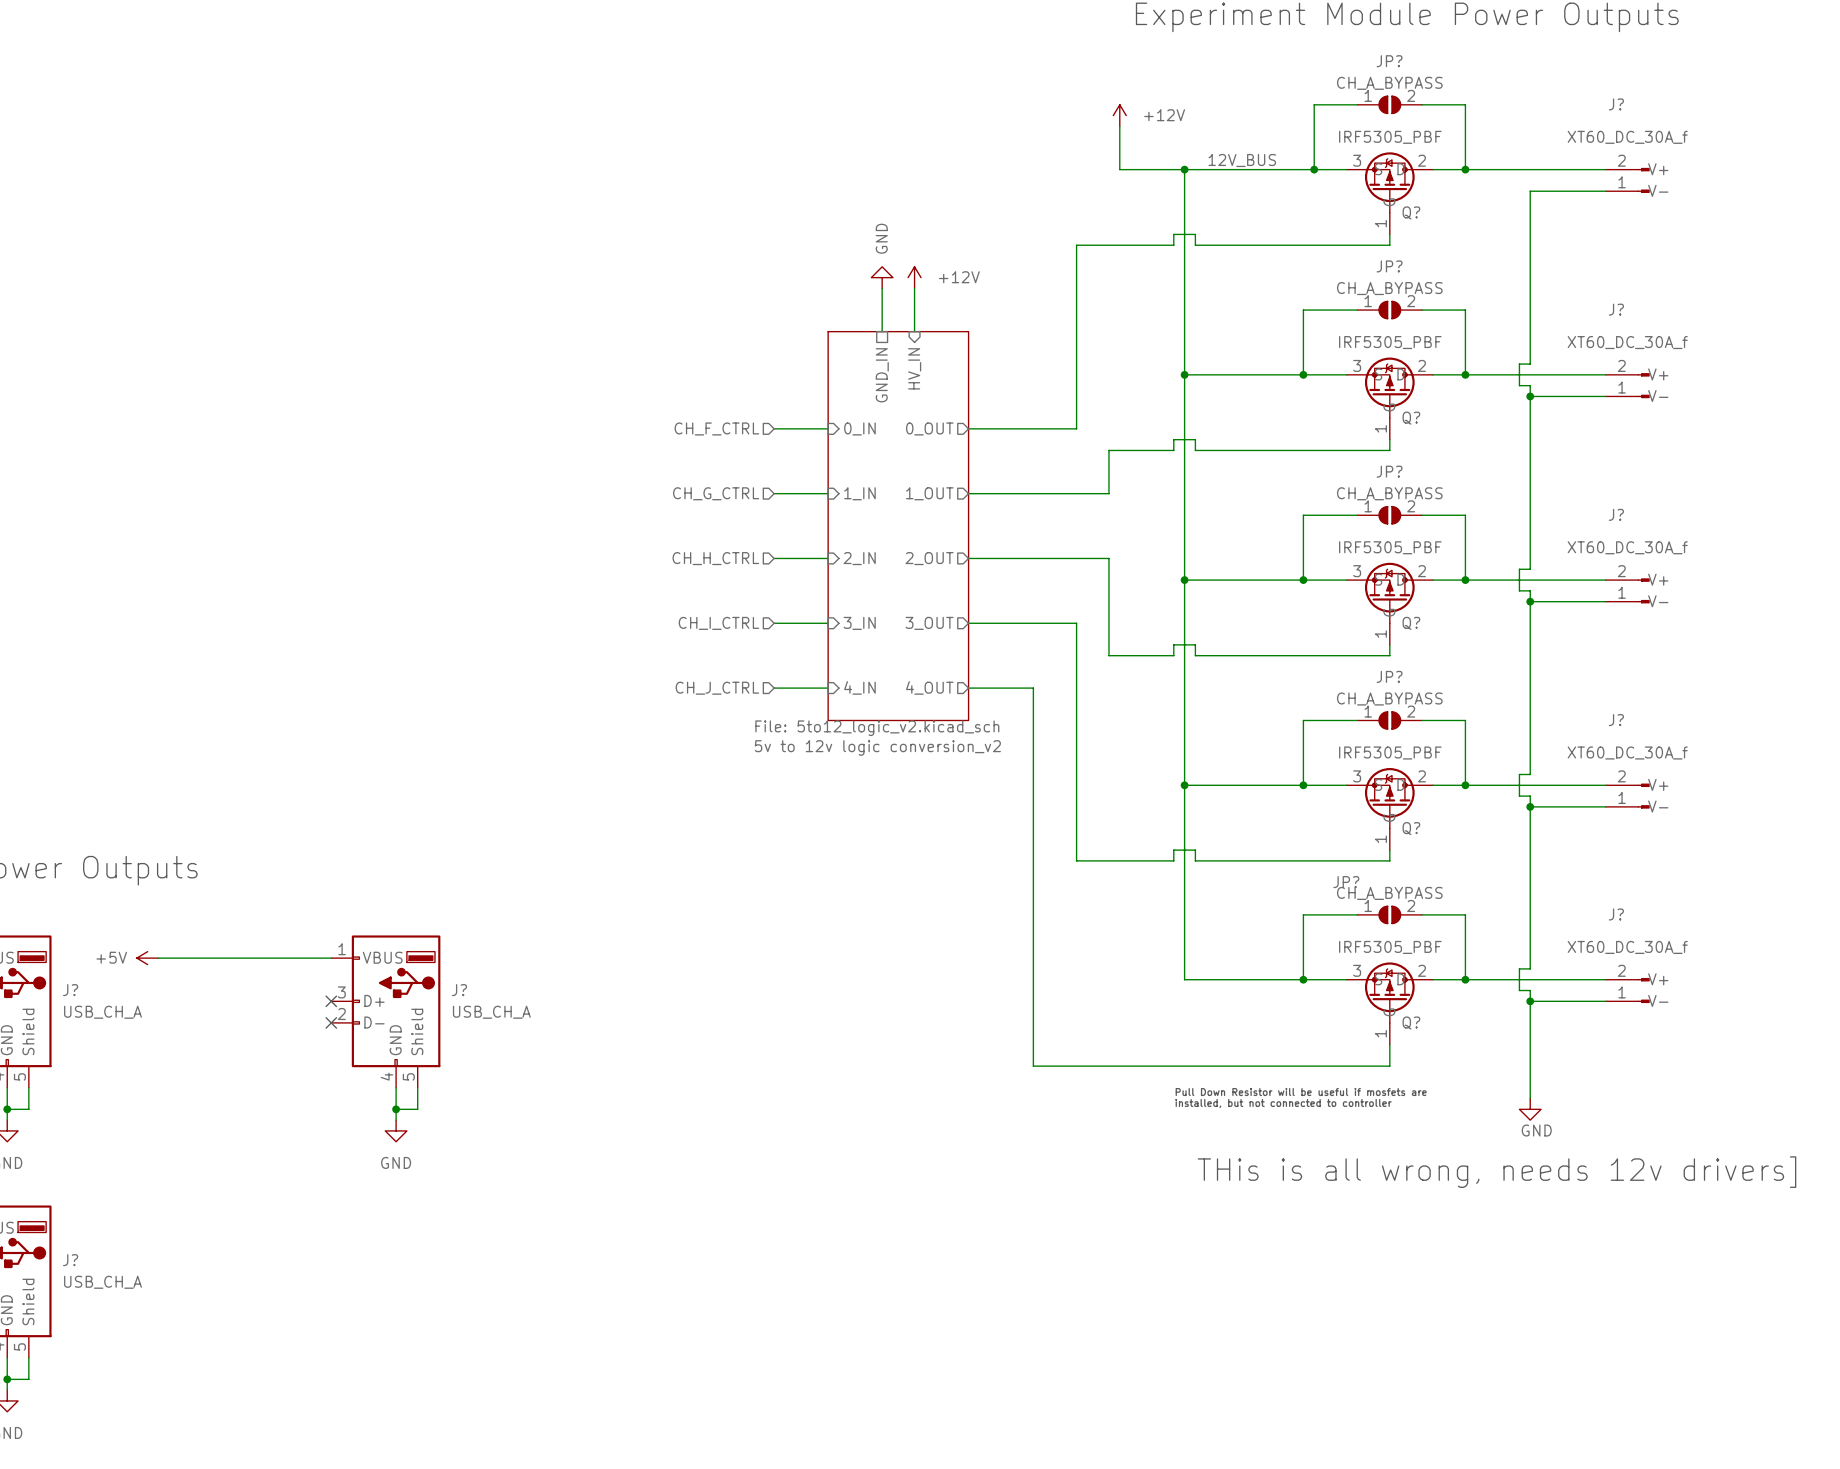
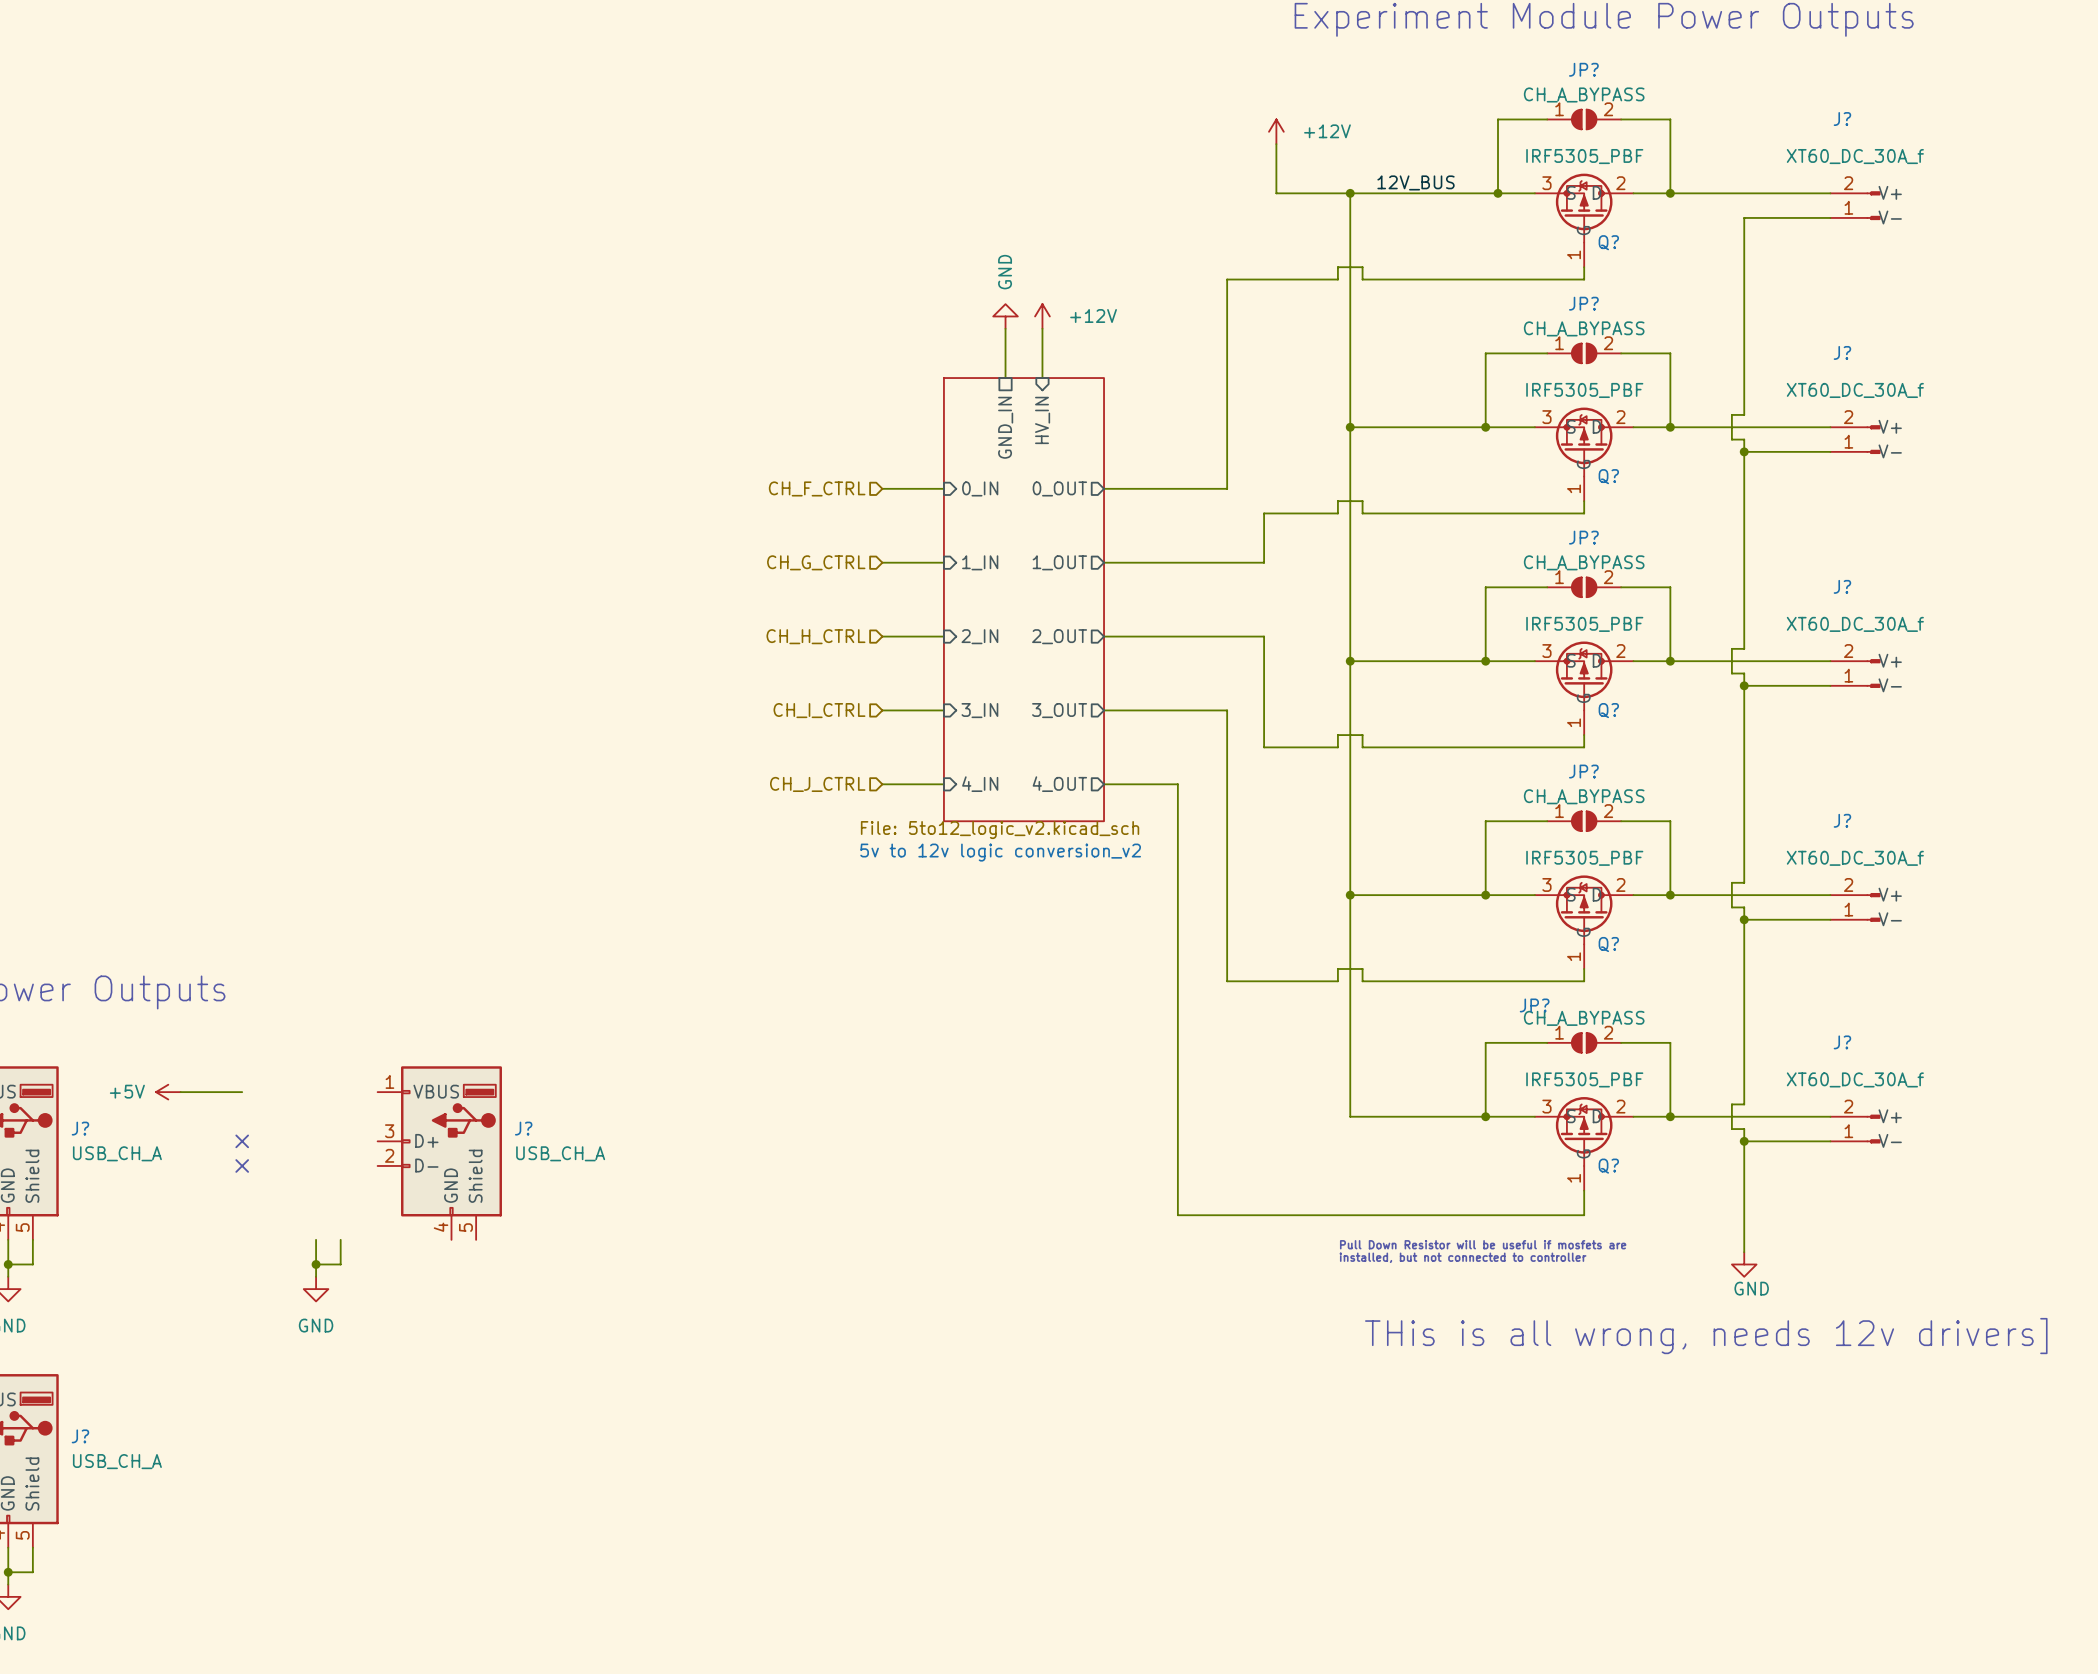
wire: (212, 958) (331, 958) -> none
no-connect mark: none -> (242, 1141)
no-connect mark: (331, 1001) -> none
no-connect mark: none -> (242, 1165)
no-connect mark: (331, 1022) -> none
wire: (396, 1087) (396, 1120) -> (316, 1239) (316, 1276)
wire: (417, 1087) (417, 1109) (396, 1109) -> (340, 1239) (340, 1264) (316, 1264)
junction: none -> (316, 1264)
junction: (396, 1109) -> none
power symbol position: GND (396, 1130) -> GND (316, 1289)

